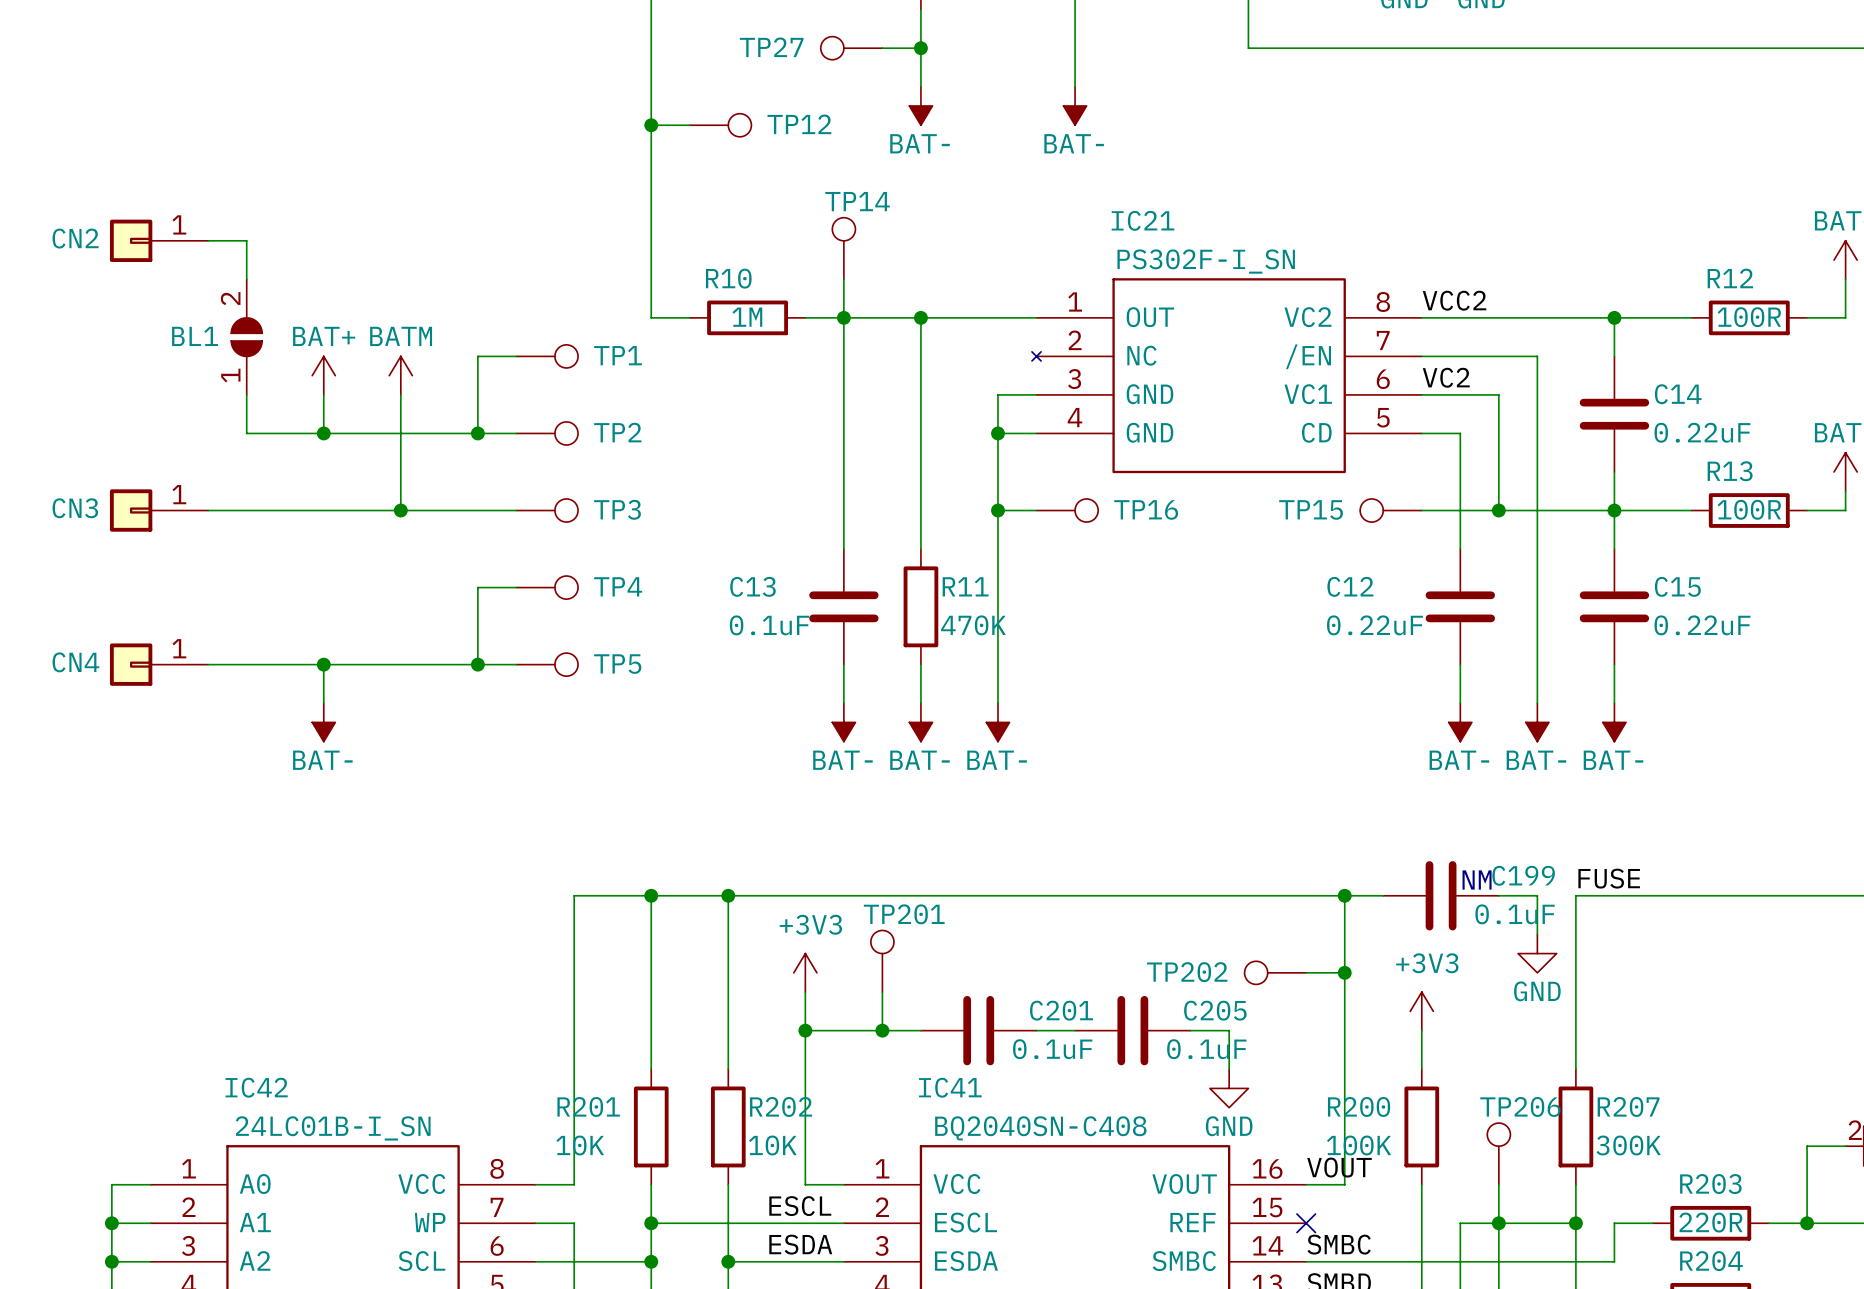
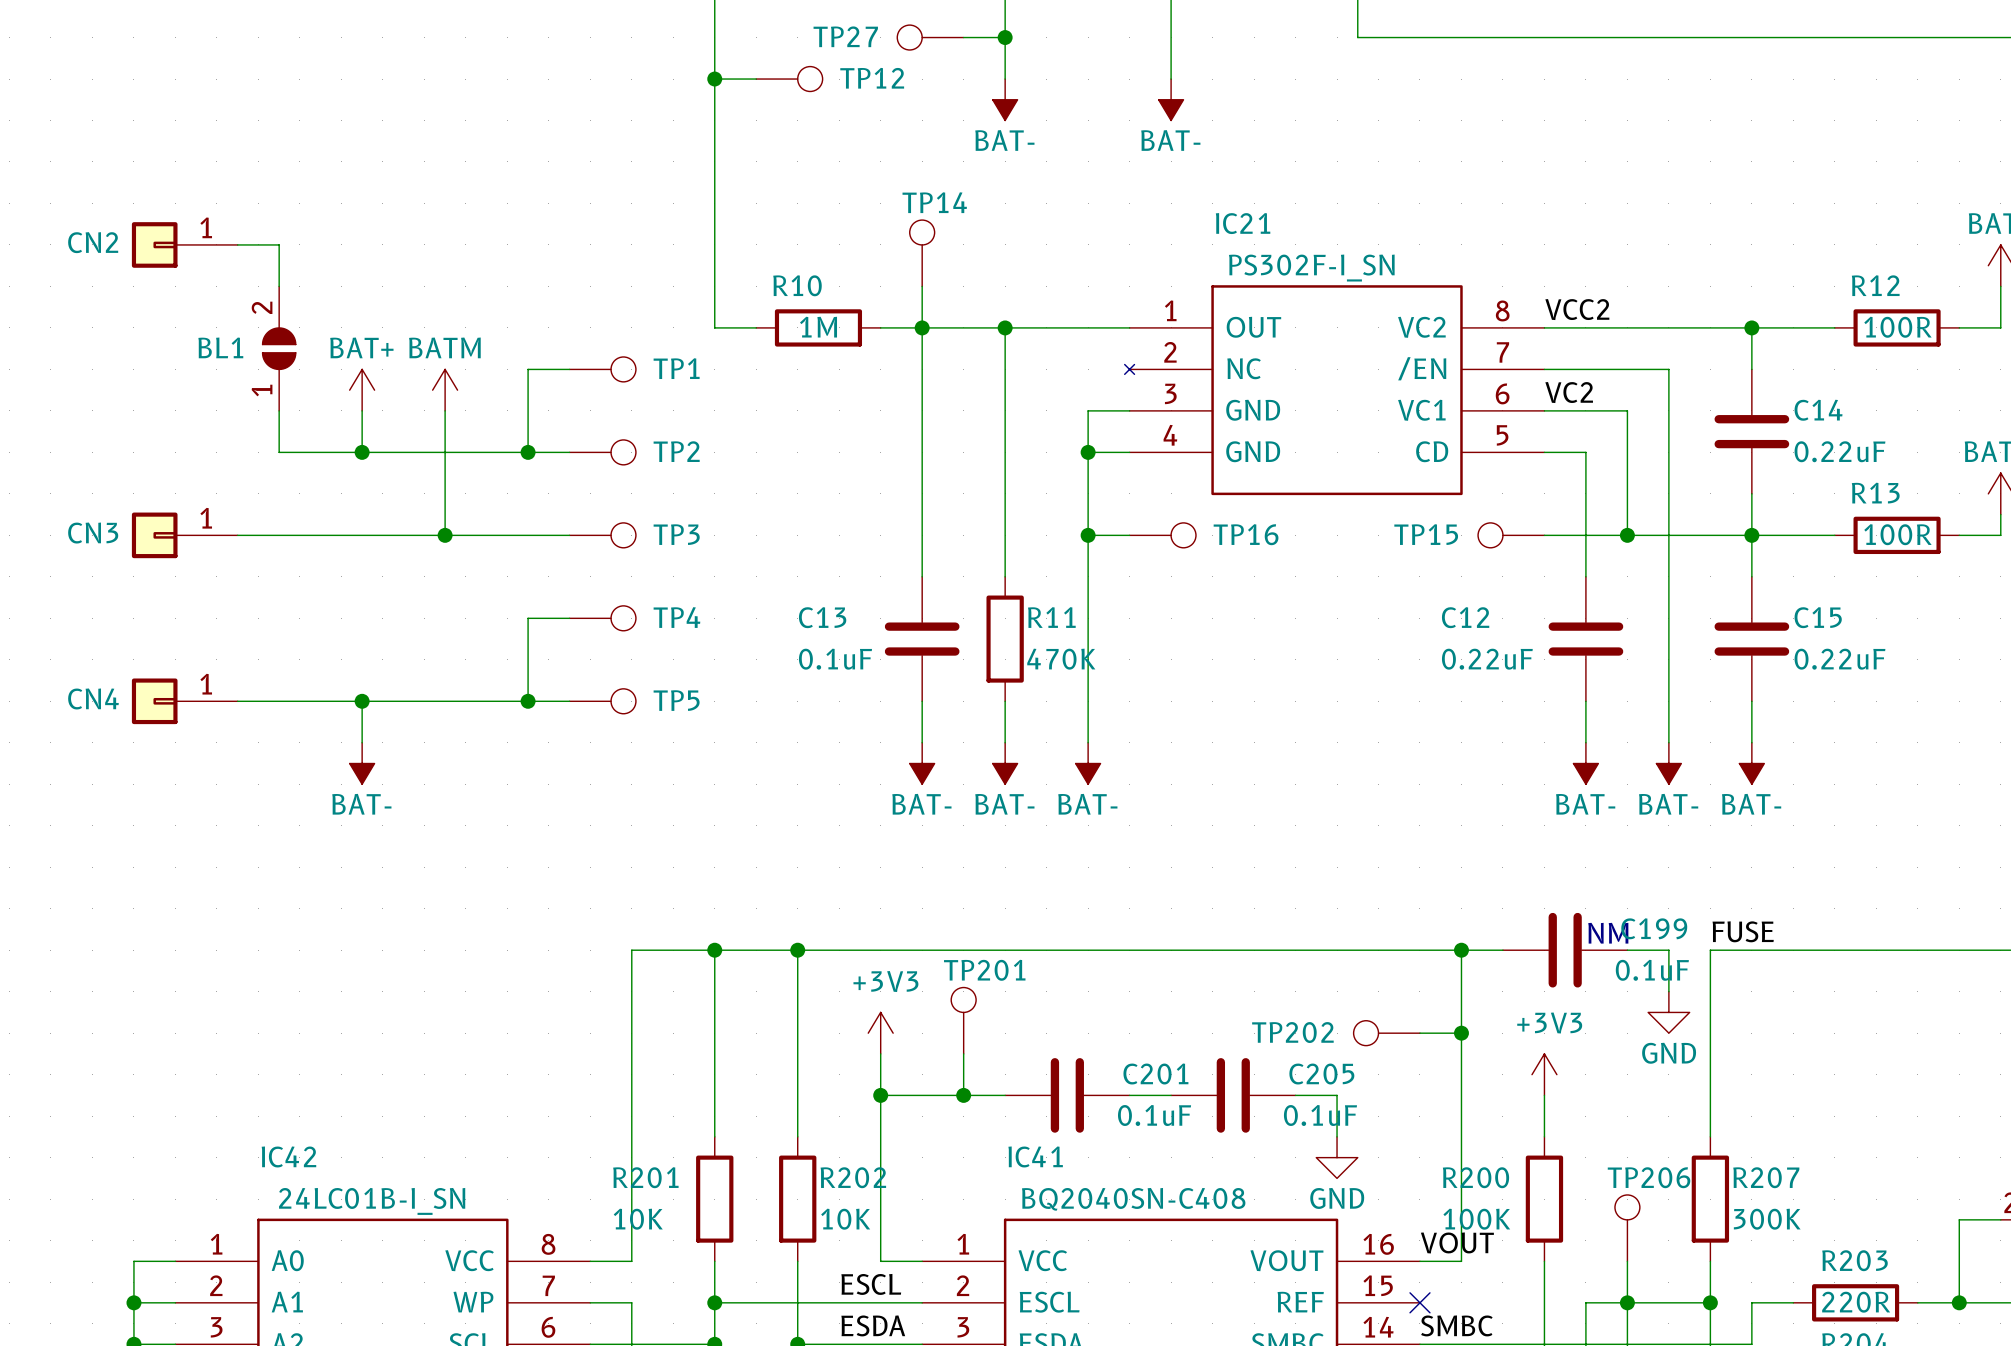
wire: (651, 125) (689, 125) -> (714, 79) (756, 79)
junction position: (651, 125) -> (714, 79)
TP12 position: (720, 125) -> (789, 79)

